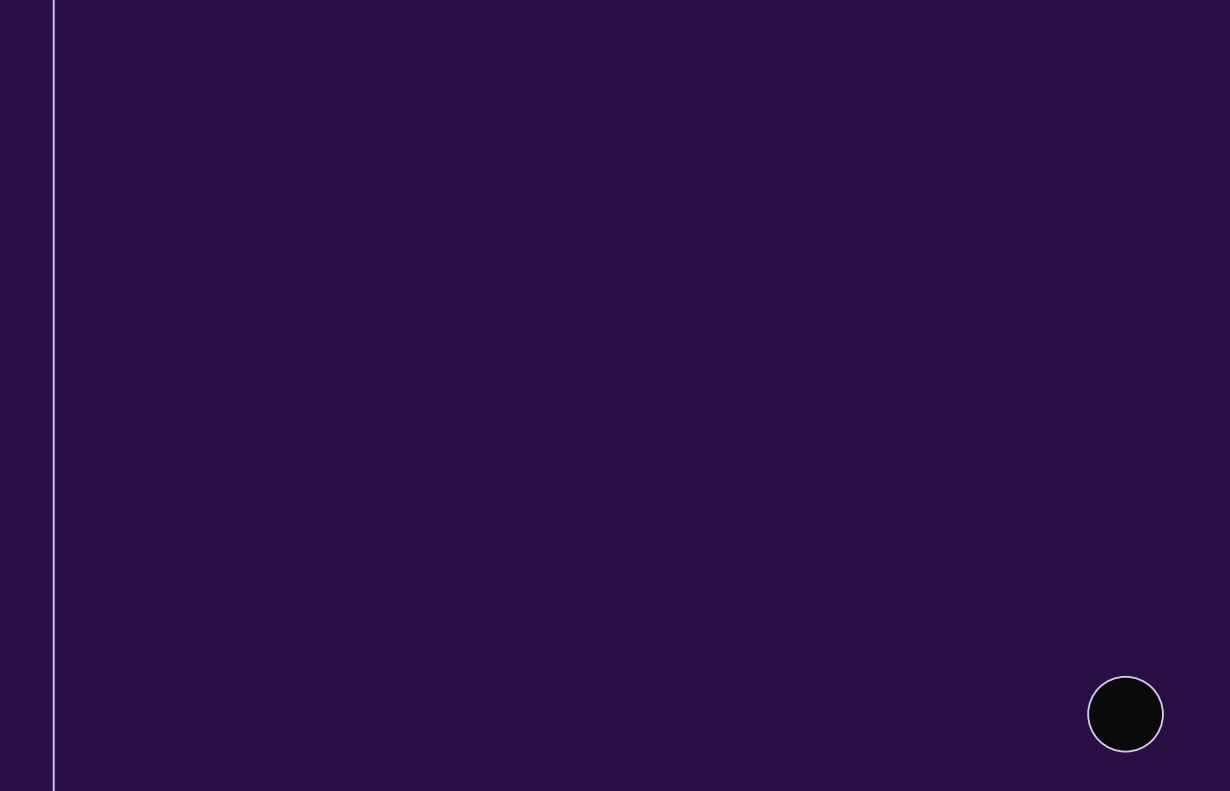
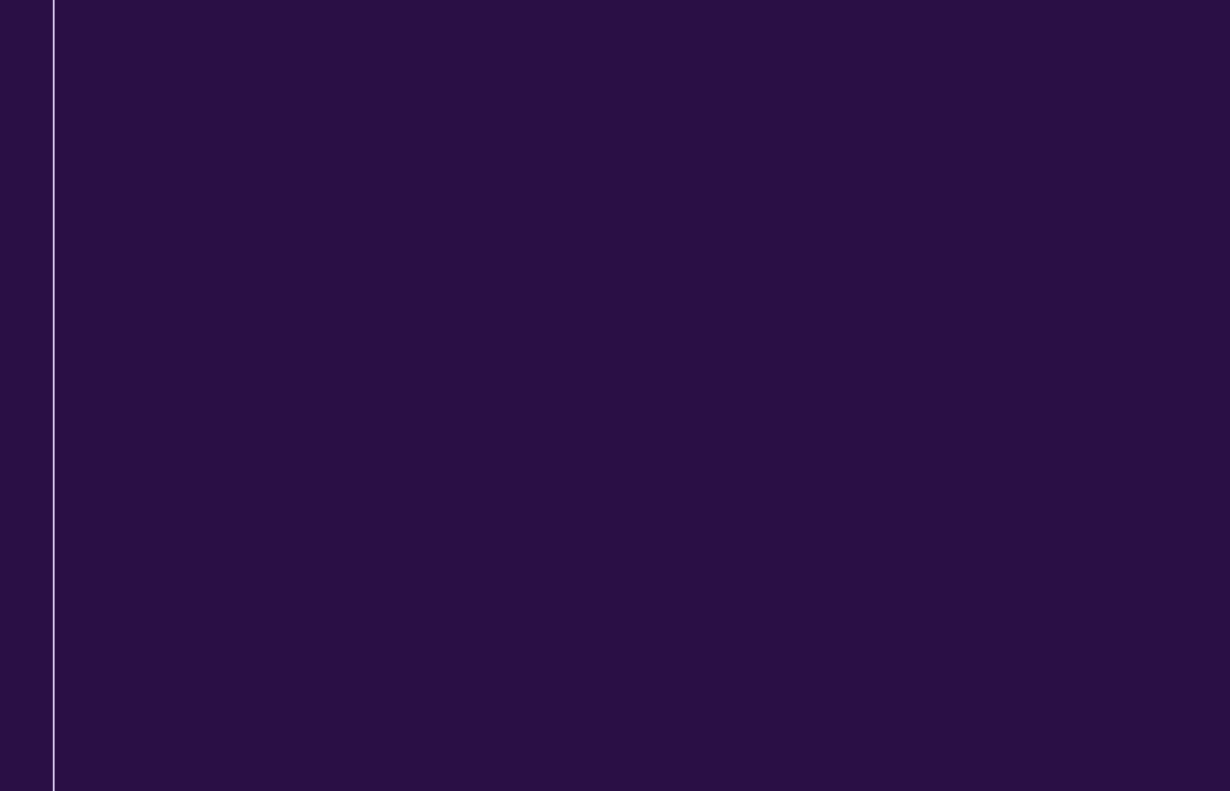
part: (1125, 714) -> none

